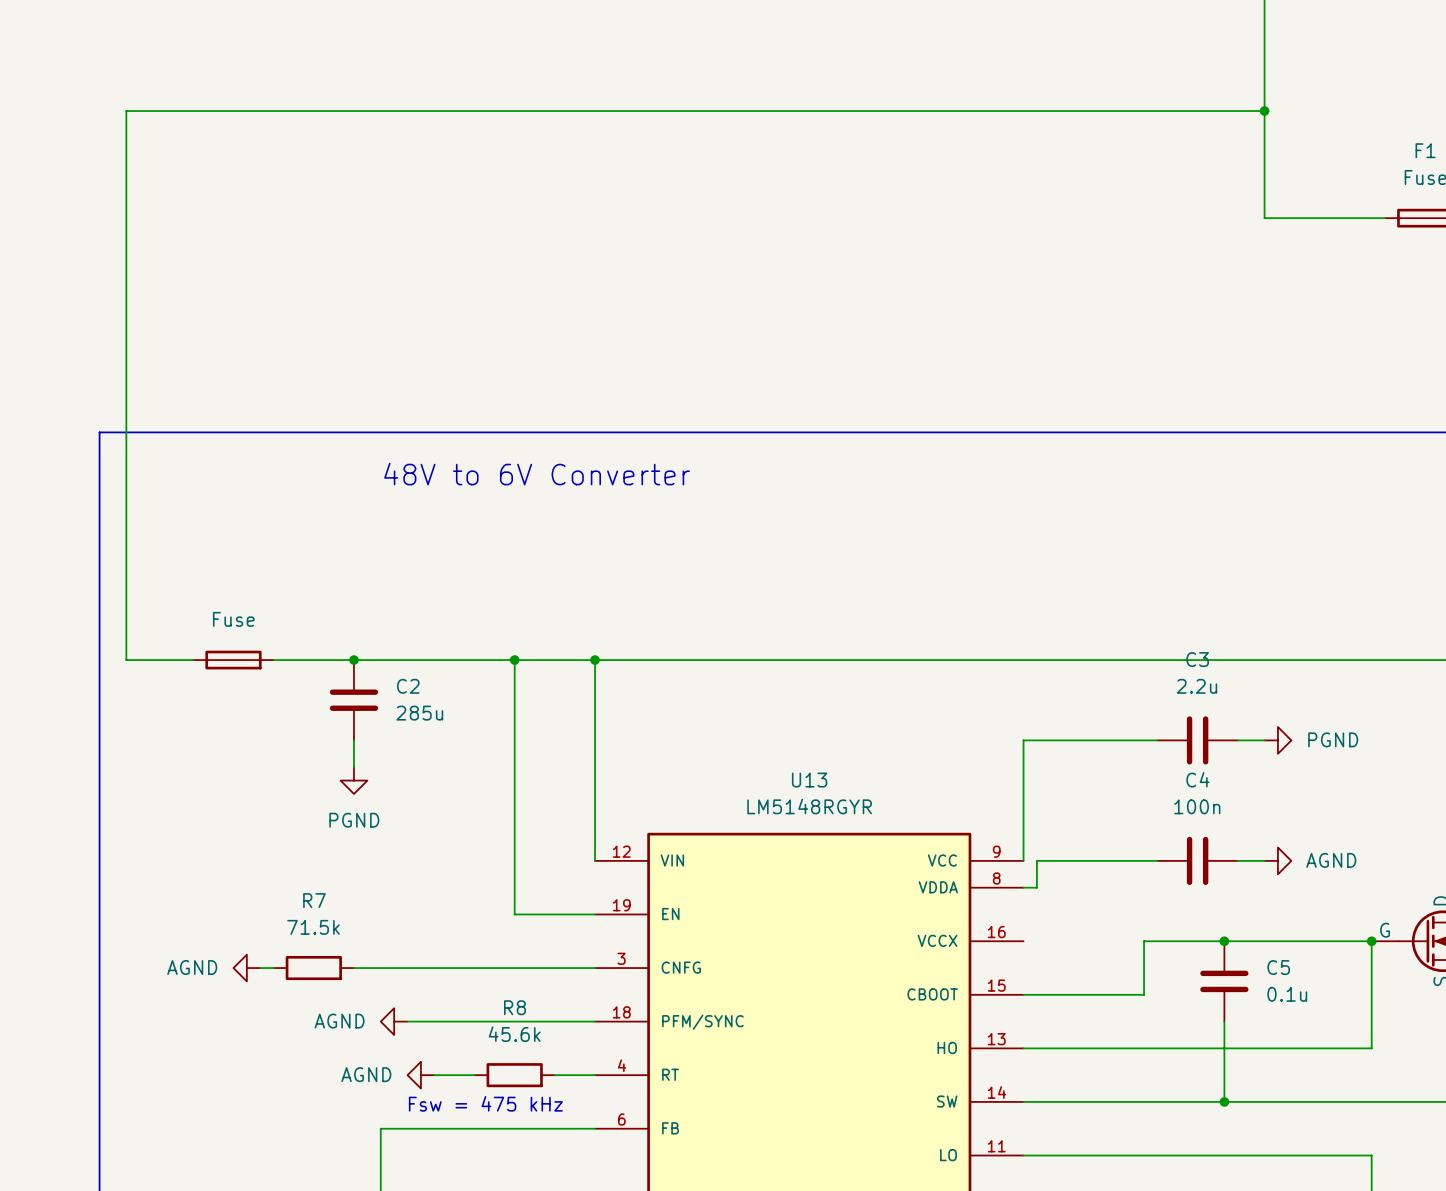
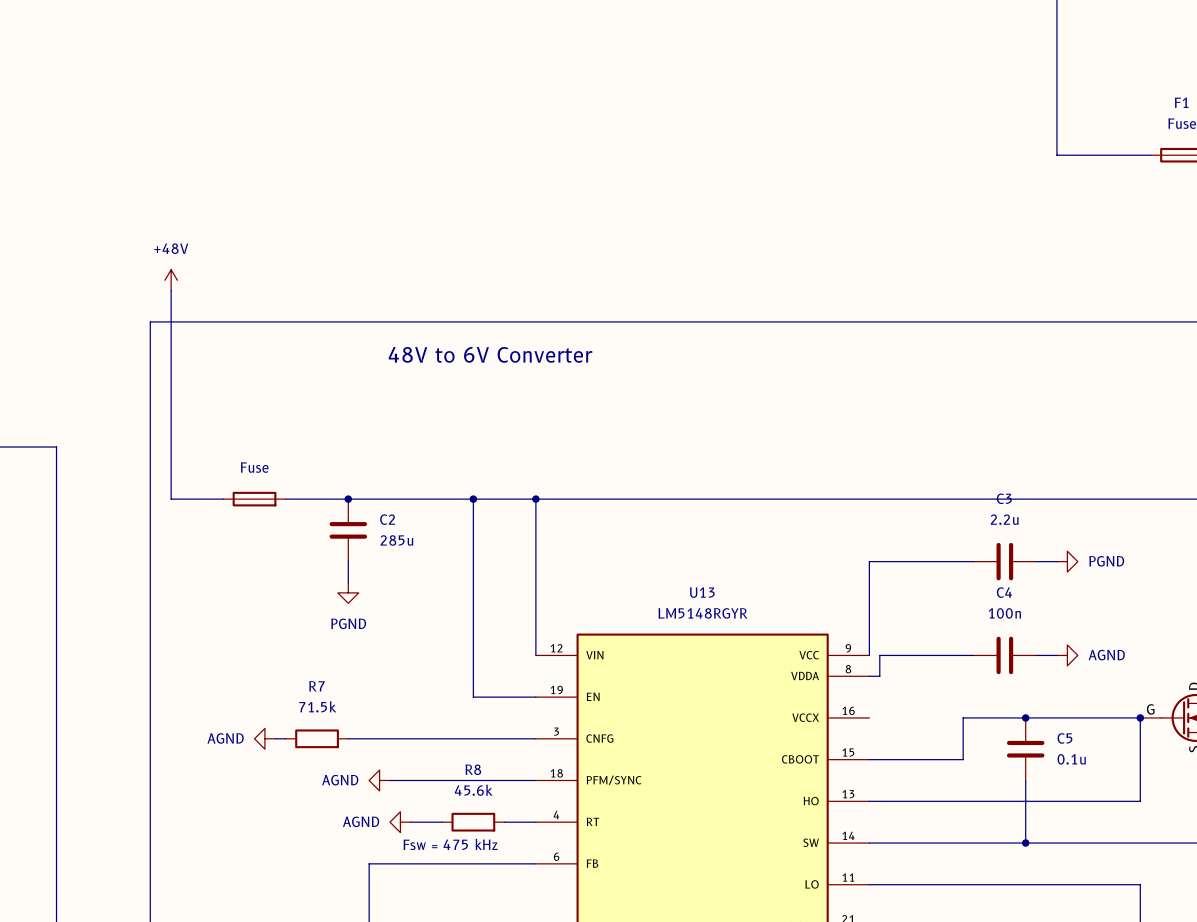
wire: (1264, 111) (126, 111) (126, 392) -> none
junction: (1264, 111) -> none
power symbol: none -> +48V (171, 280)

